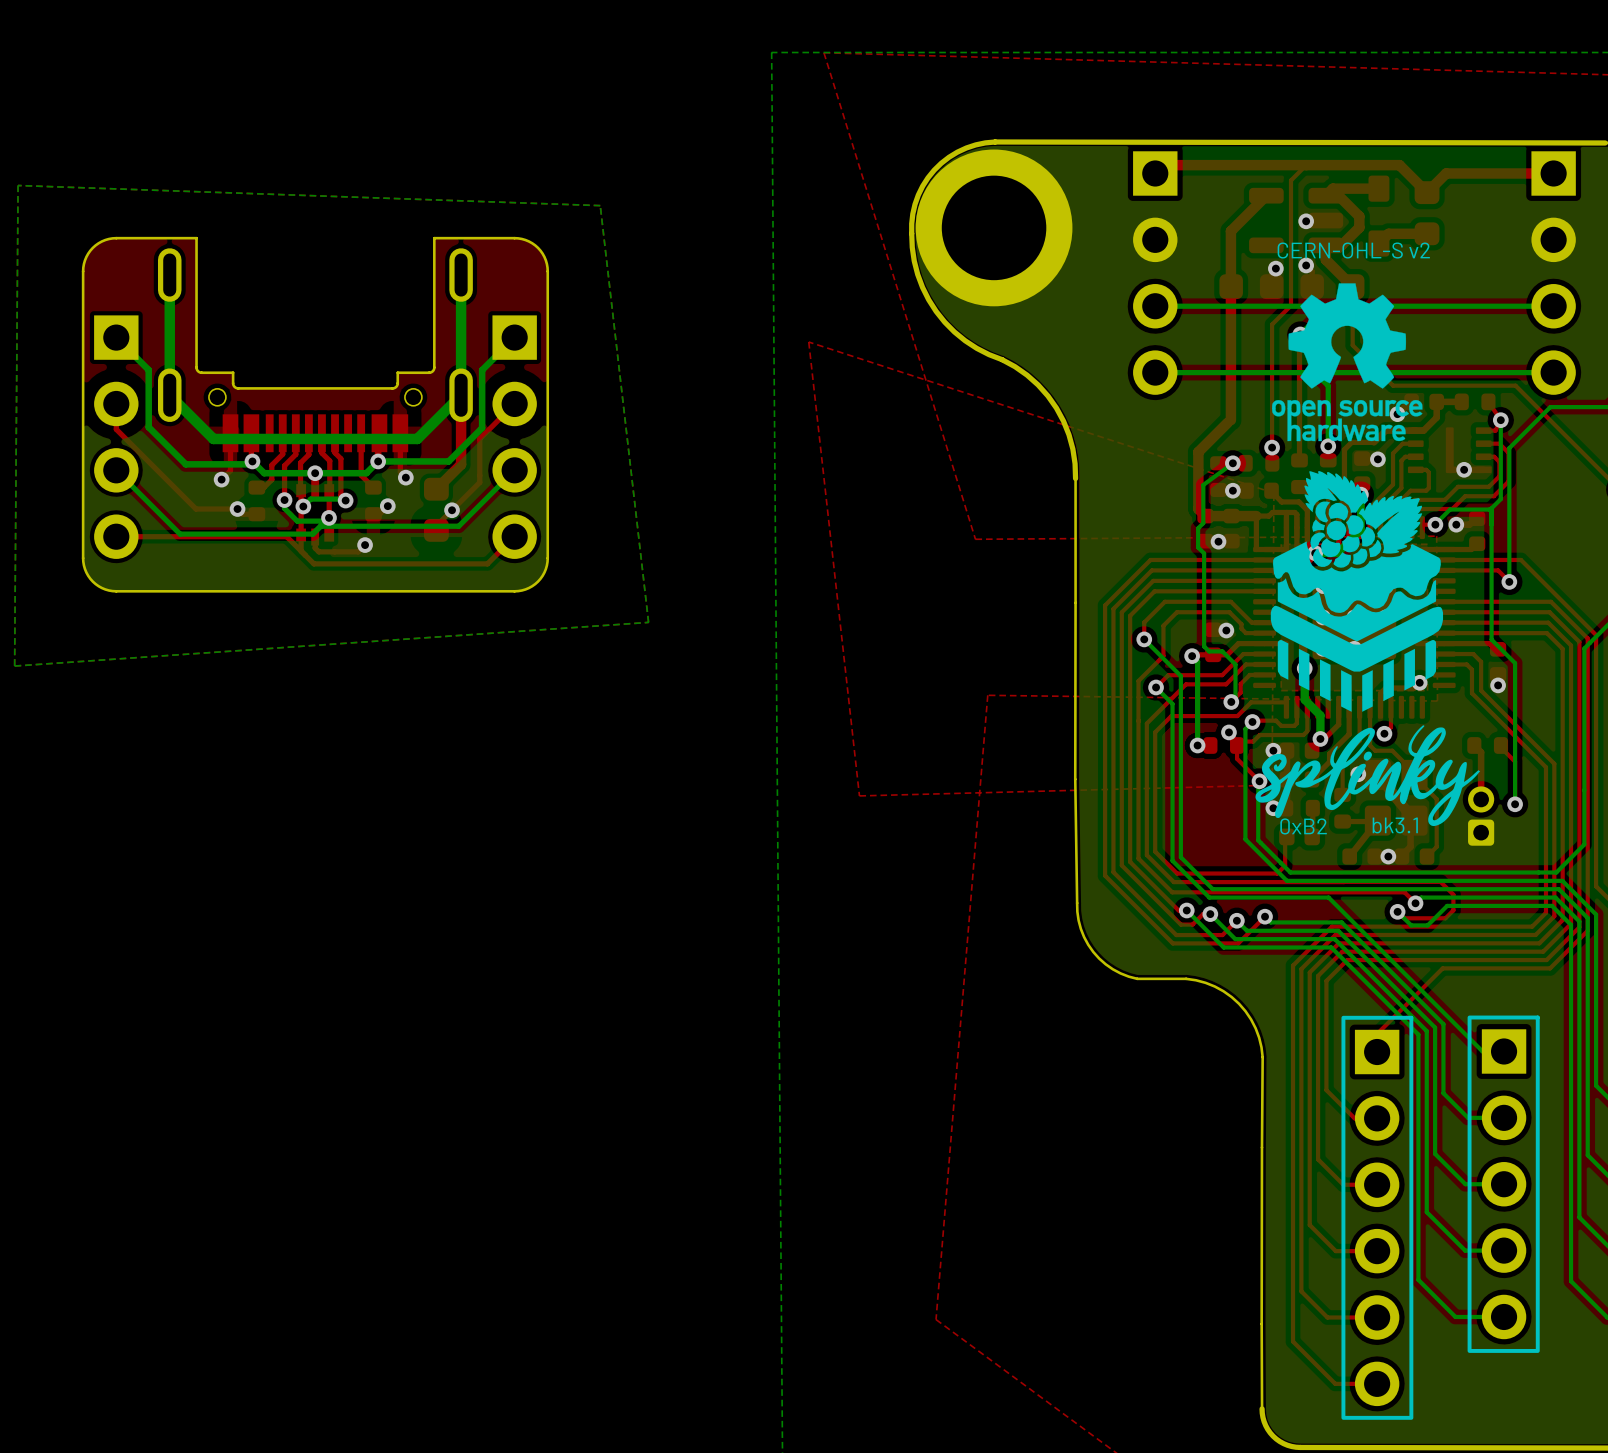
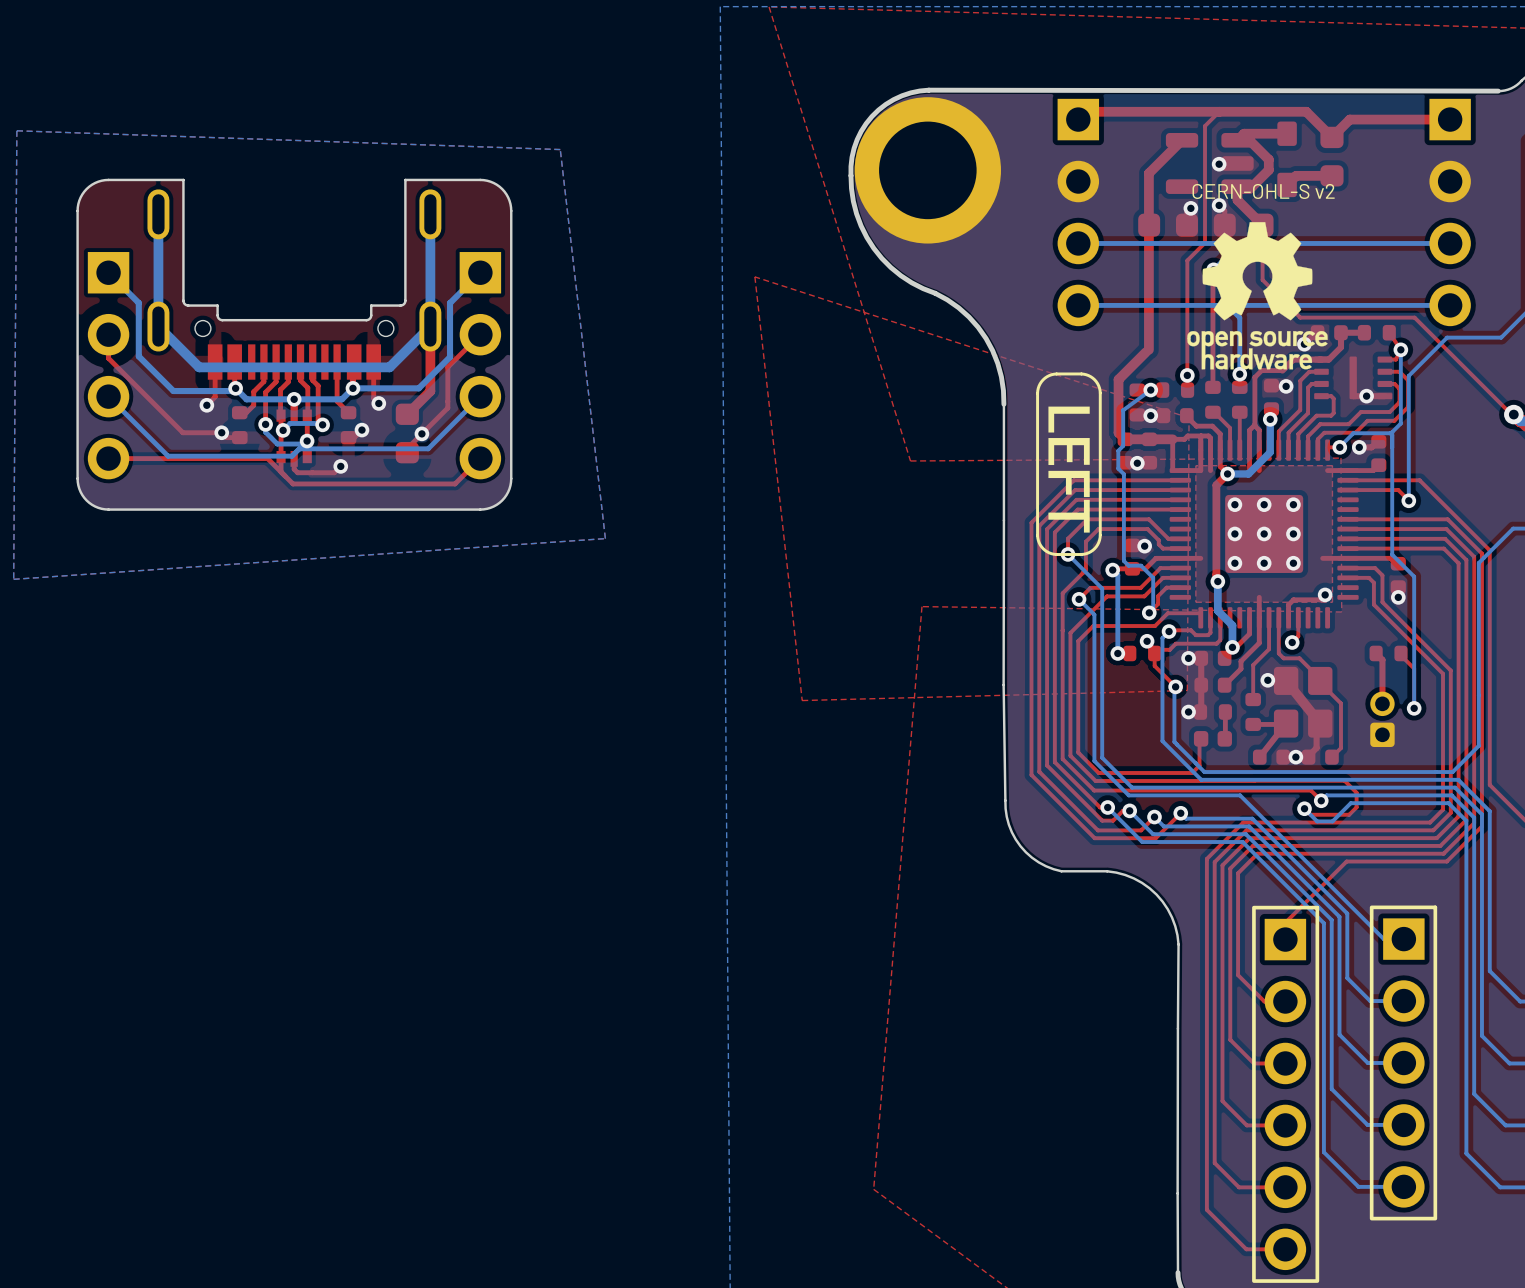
line: none -> (1081, 373) (1049, 375) (1041, 381) (1037, 390) (1037, 537) (1043, 548) (1053, 554) (1088, 552) (1096, 546) (1100, 537) (1100, 390) (1094, 379) (1081, 373)
drawing: [1255, 471, 1481, 827] -> none
drawing: none -> [1048, 406, 1090, 533]
text: bk3.1 (1395, 825) -> none
text: 0xB2 (1303, 826) -> none

